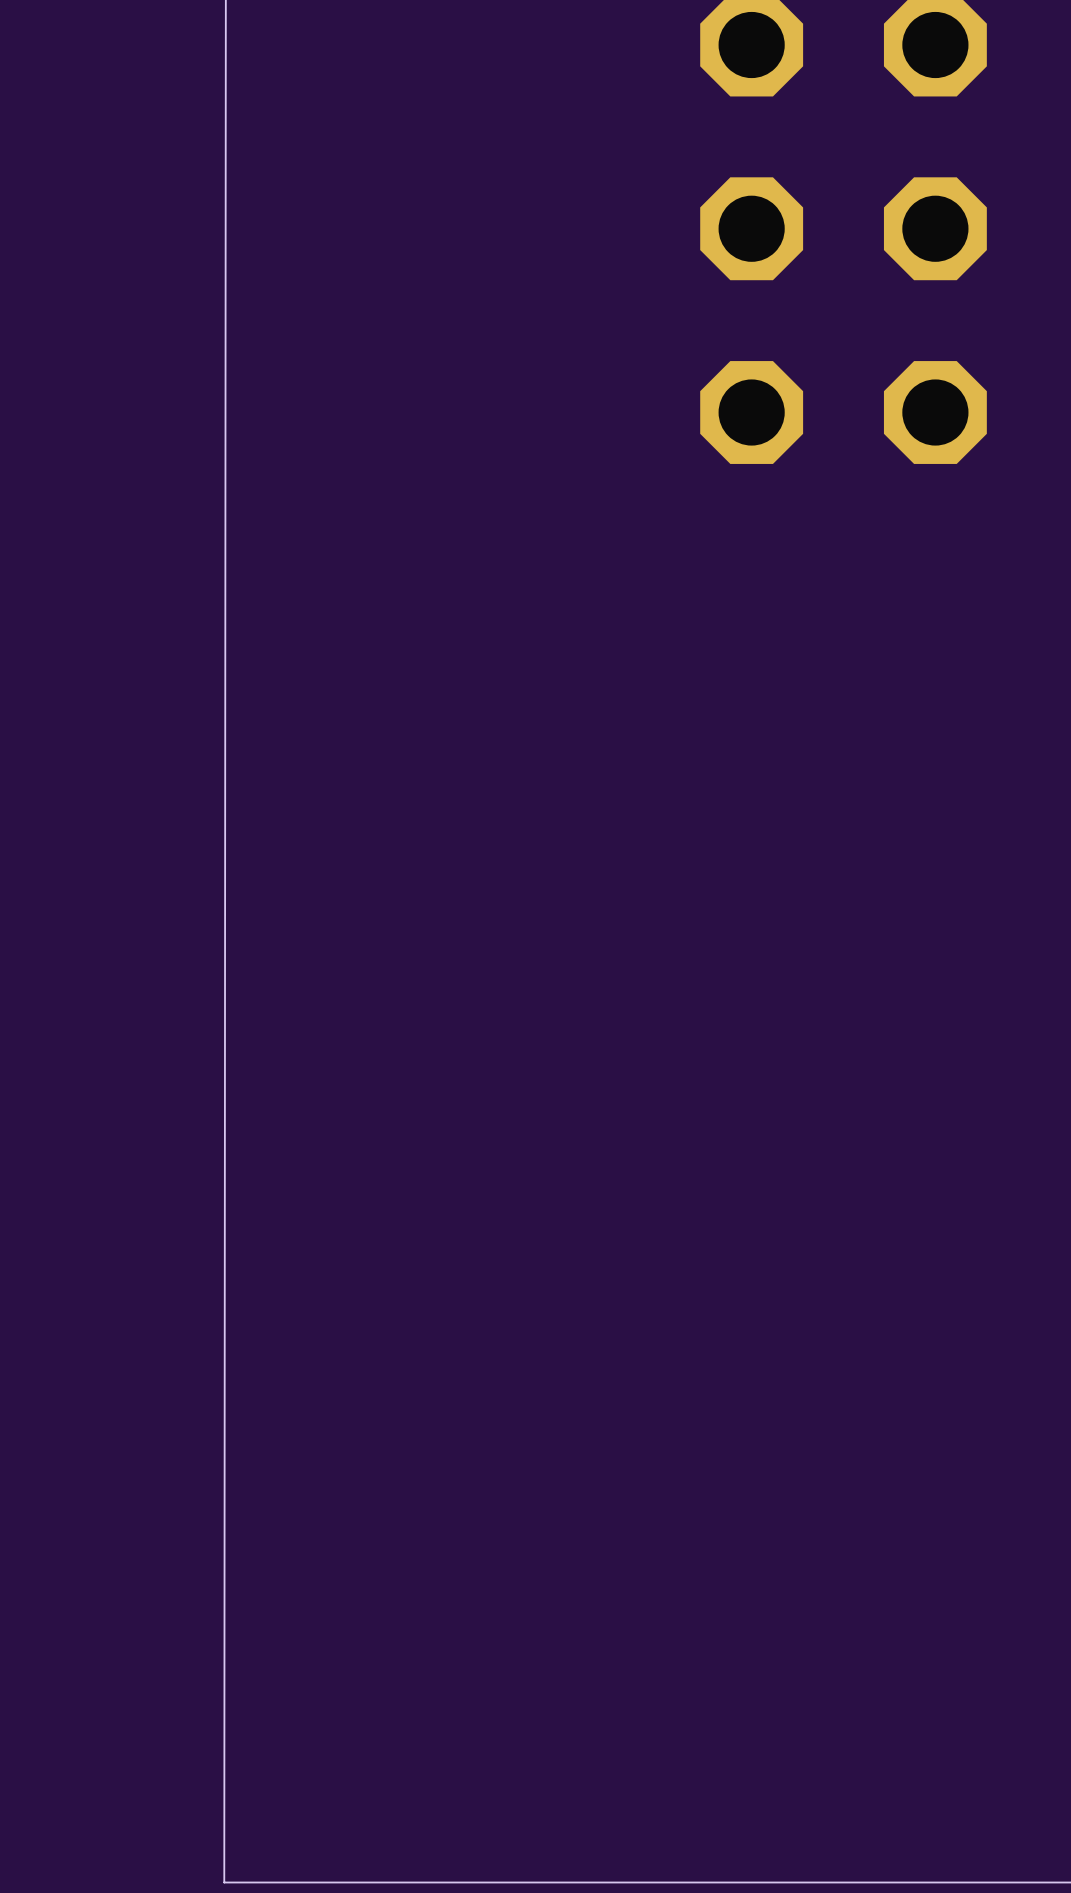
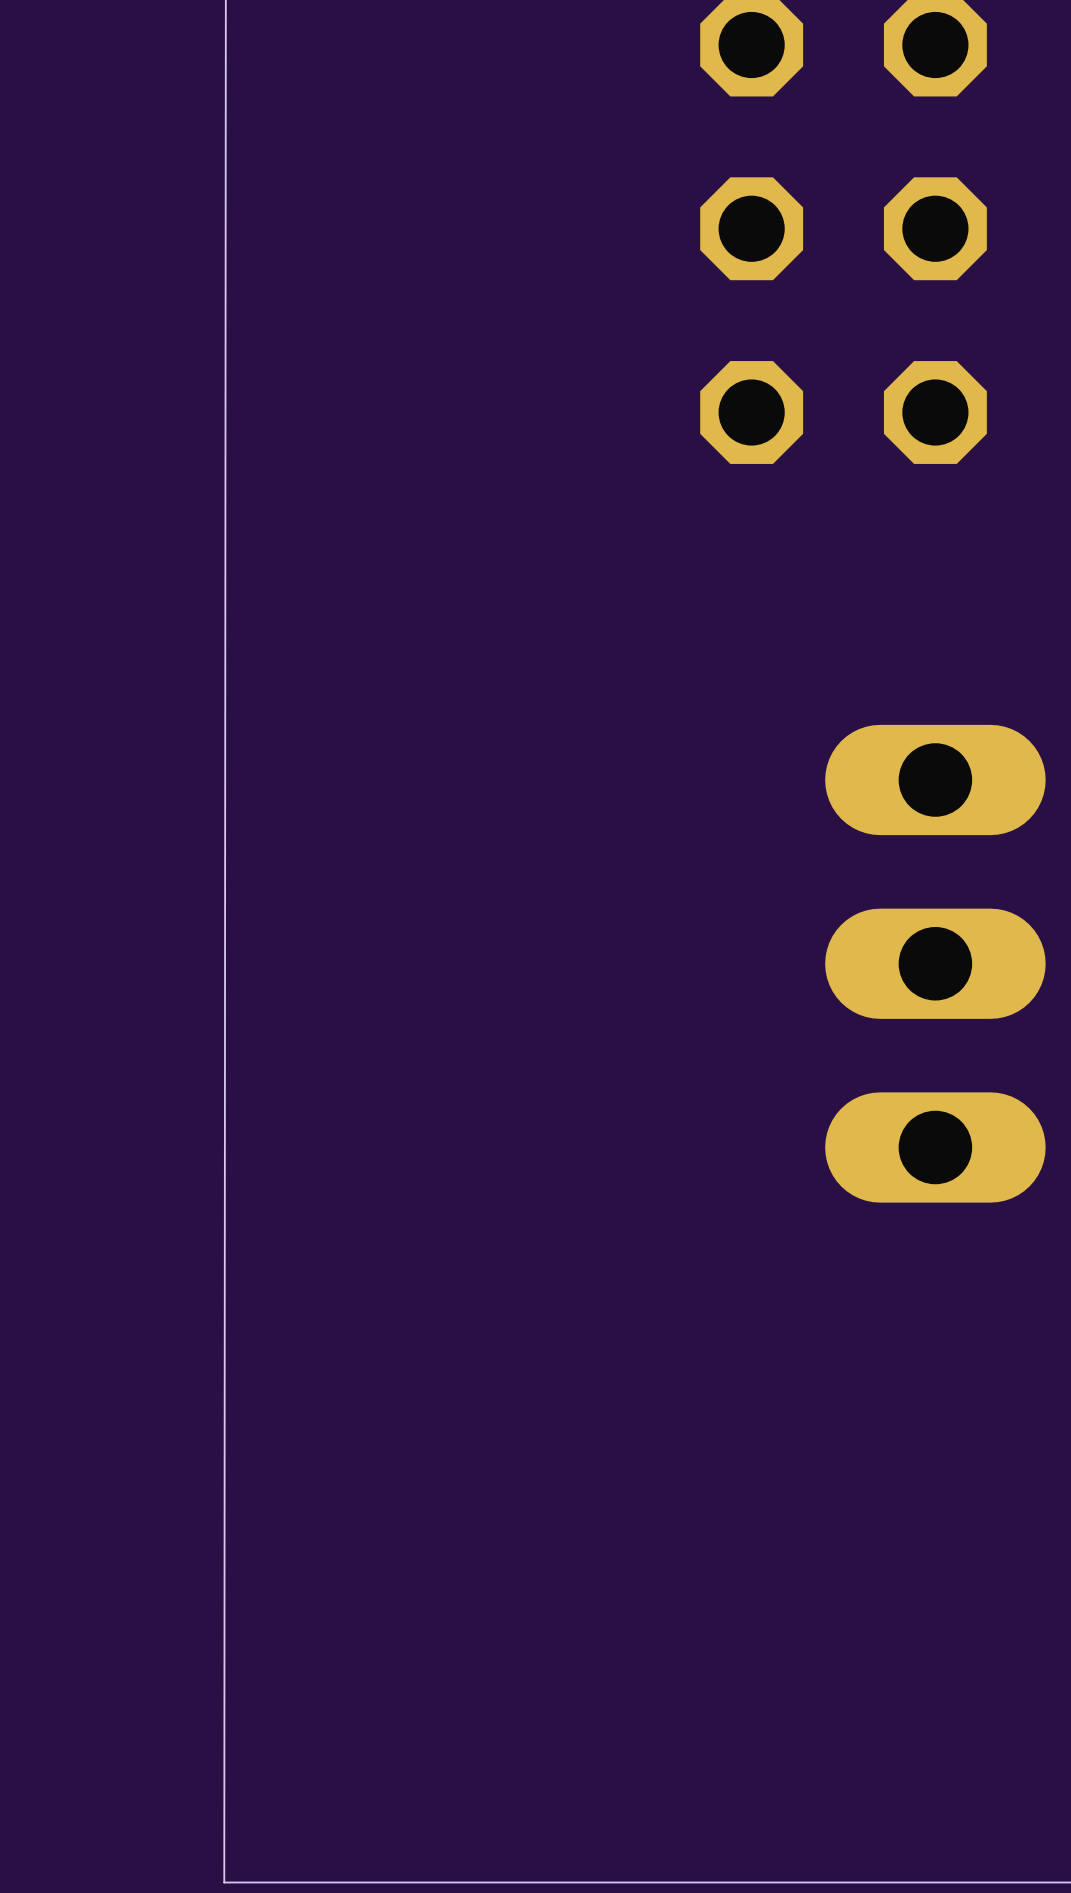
part: none -> (935, 963)

